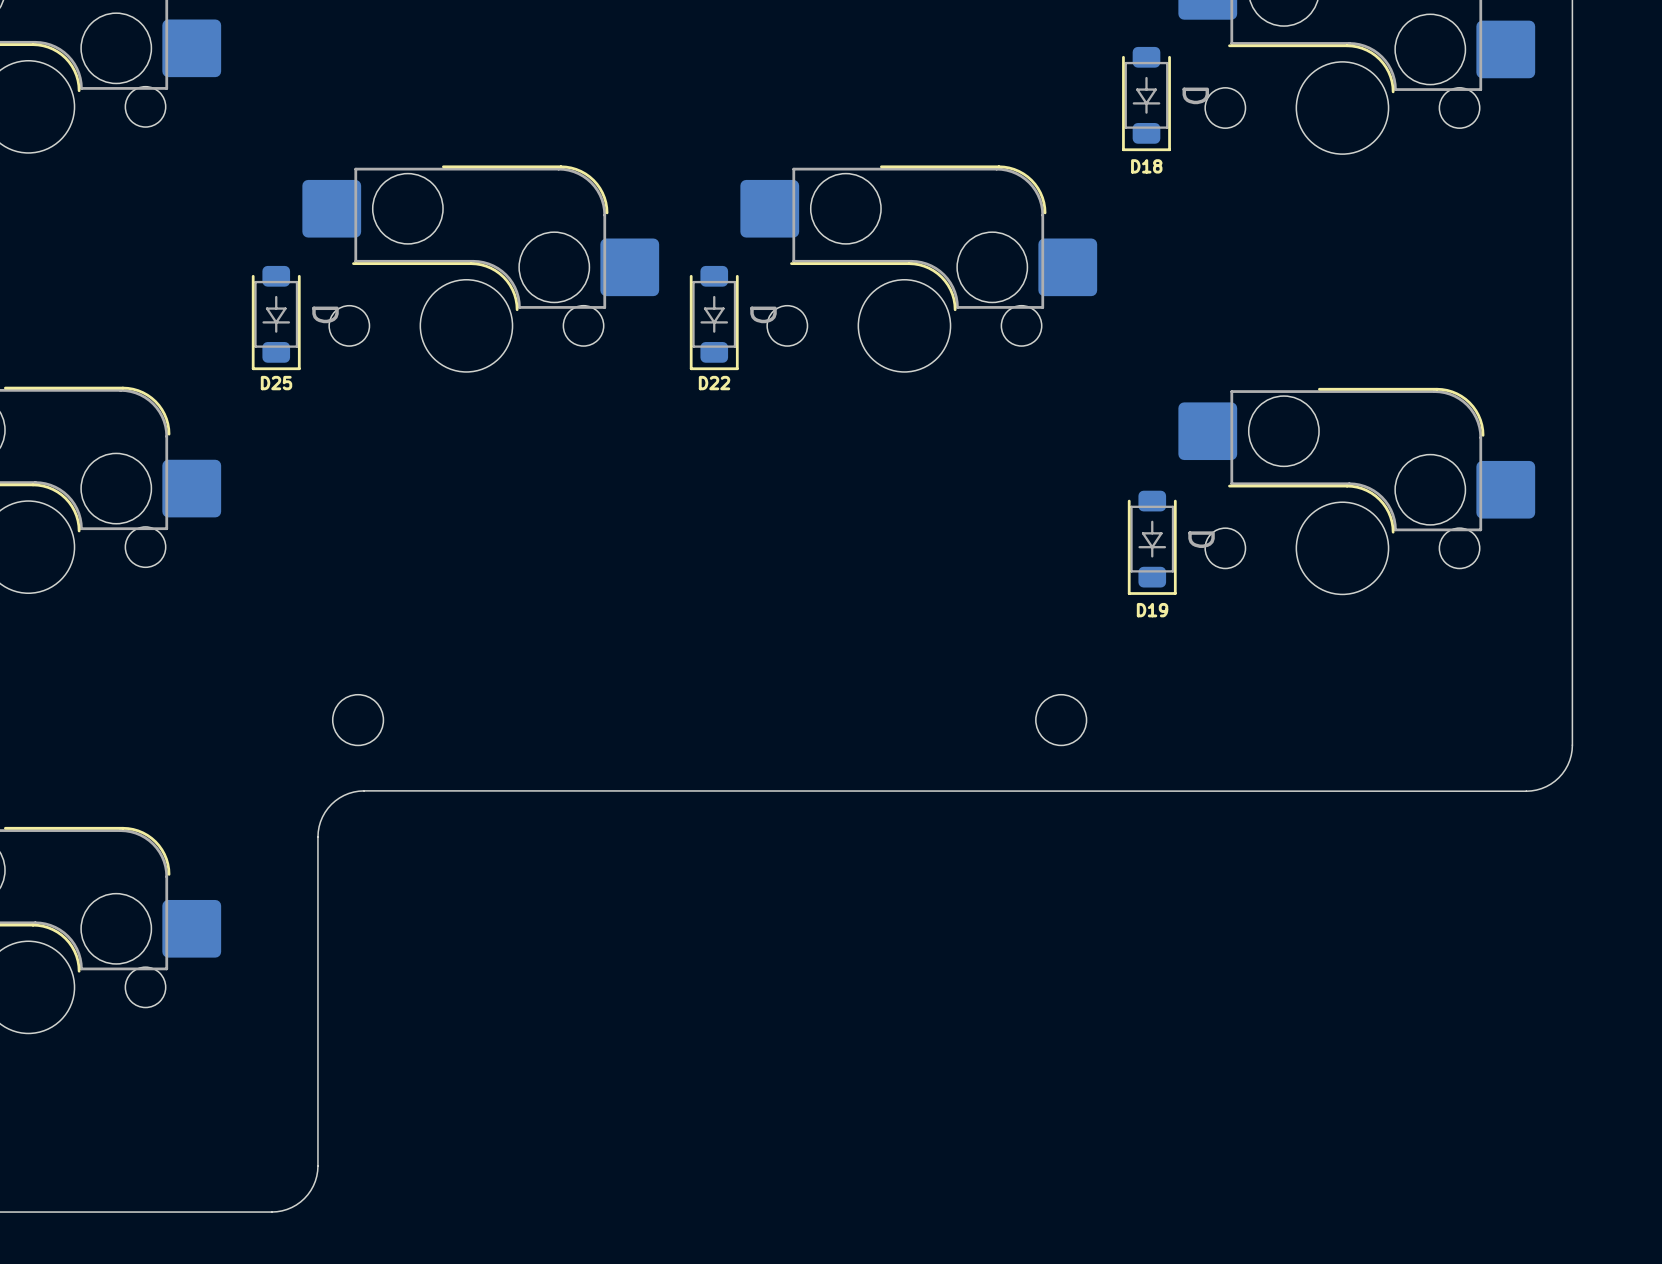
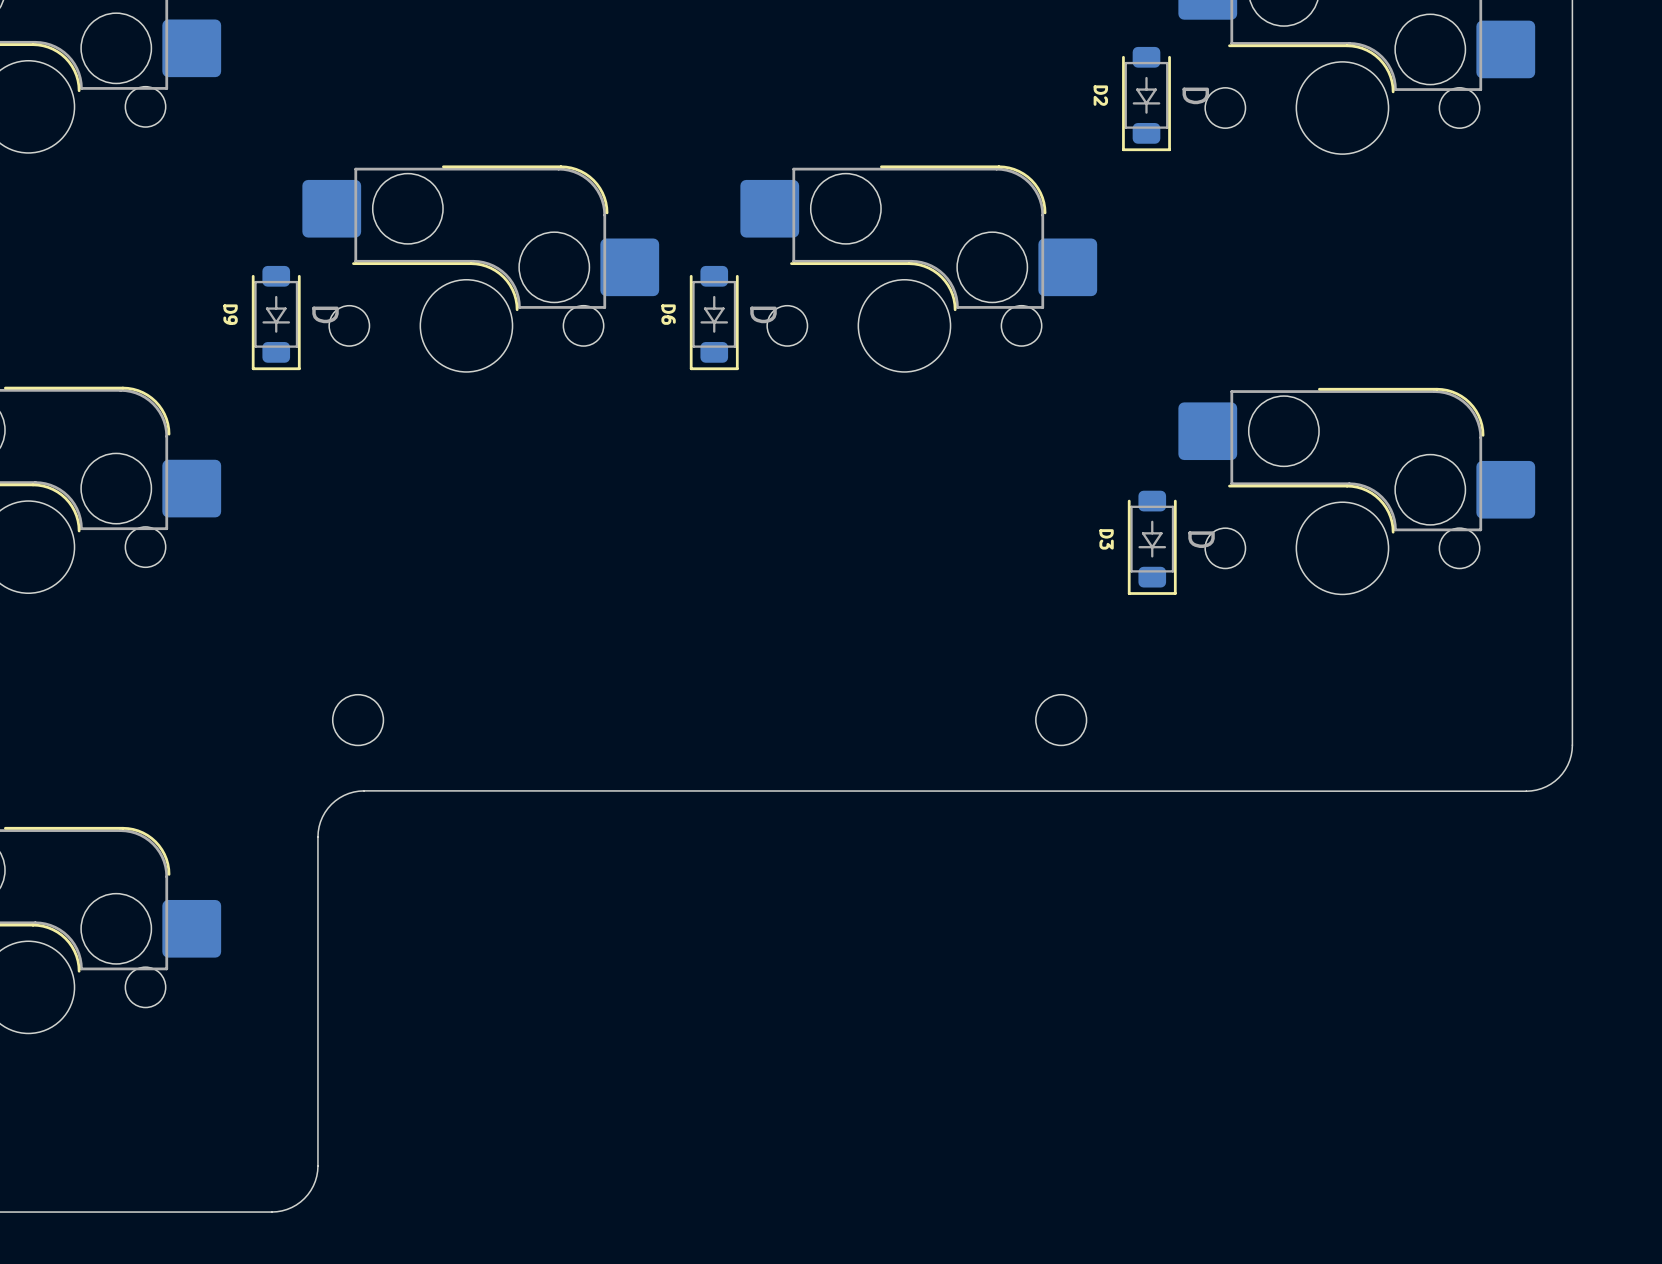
D18 name: D18 (1146, 166) -> D2 (1100, 95)
D25 name: D25 (276, 383) -> D9 (230, 314)
D22 name: D22 (714, 383) -> D6 (668, 314)
D19 name: D19 (1152, 610) -> D3 (1106, 539)

